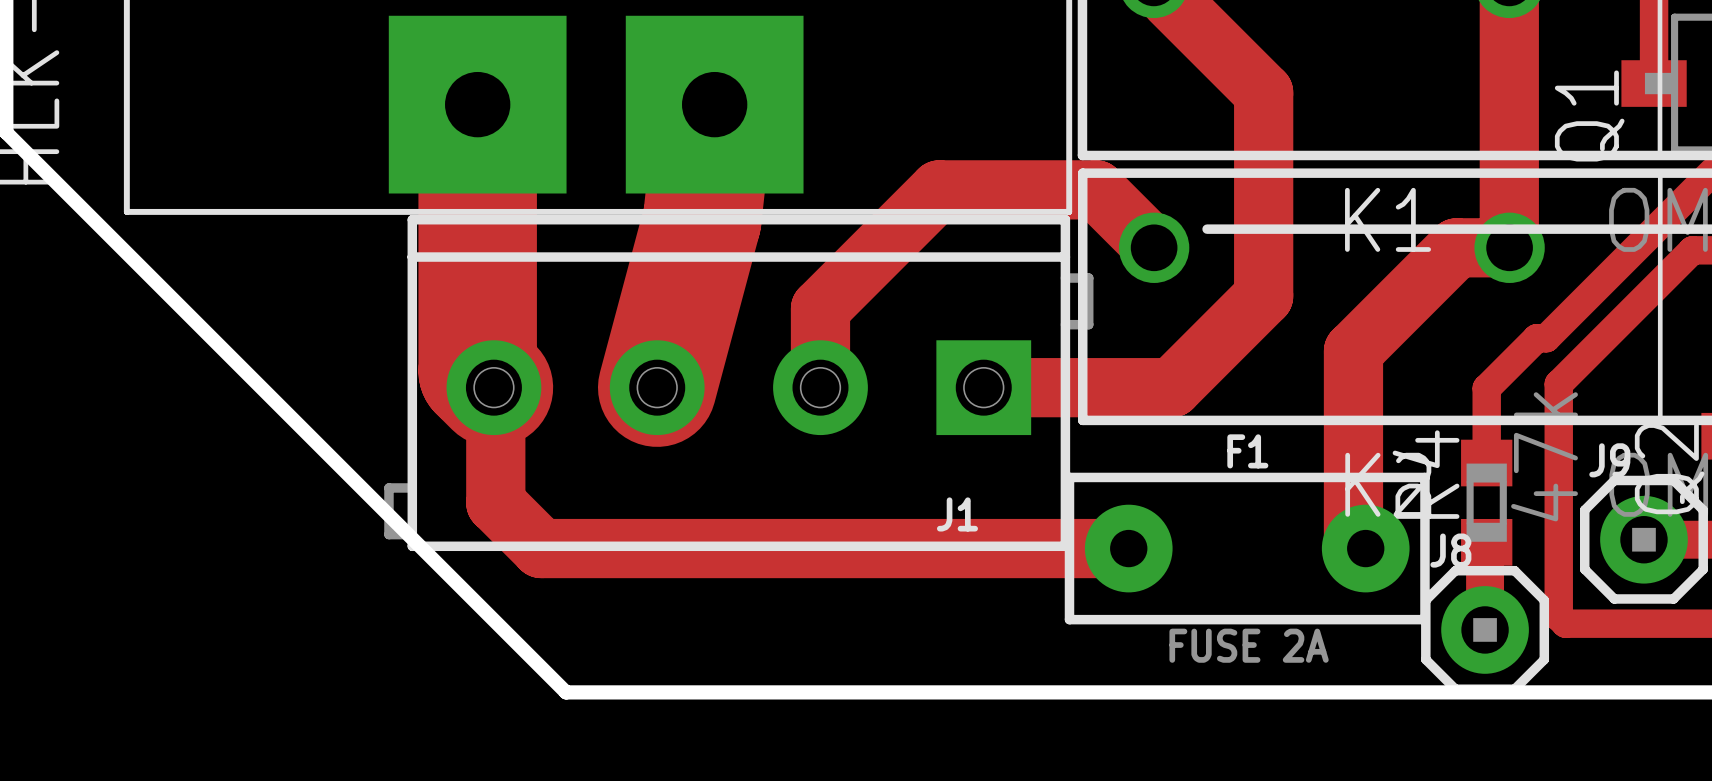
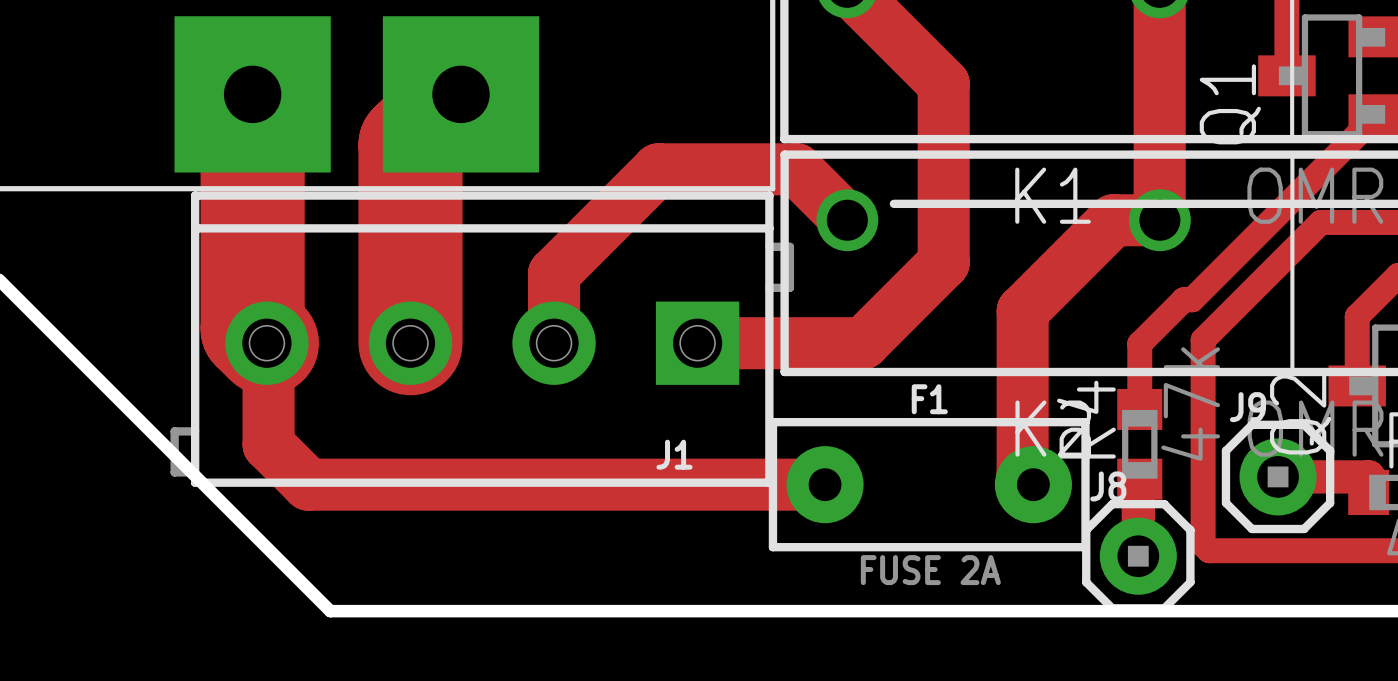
track: (714, 104) (702, 219) (657, 387) -> (460, 94) (410, 144) (410, 343)

